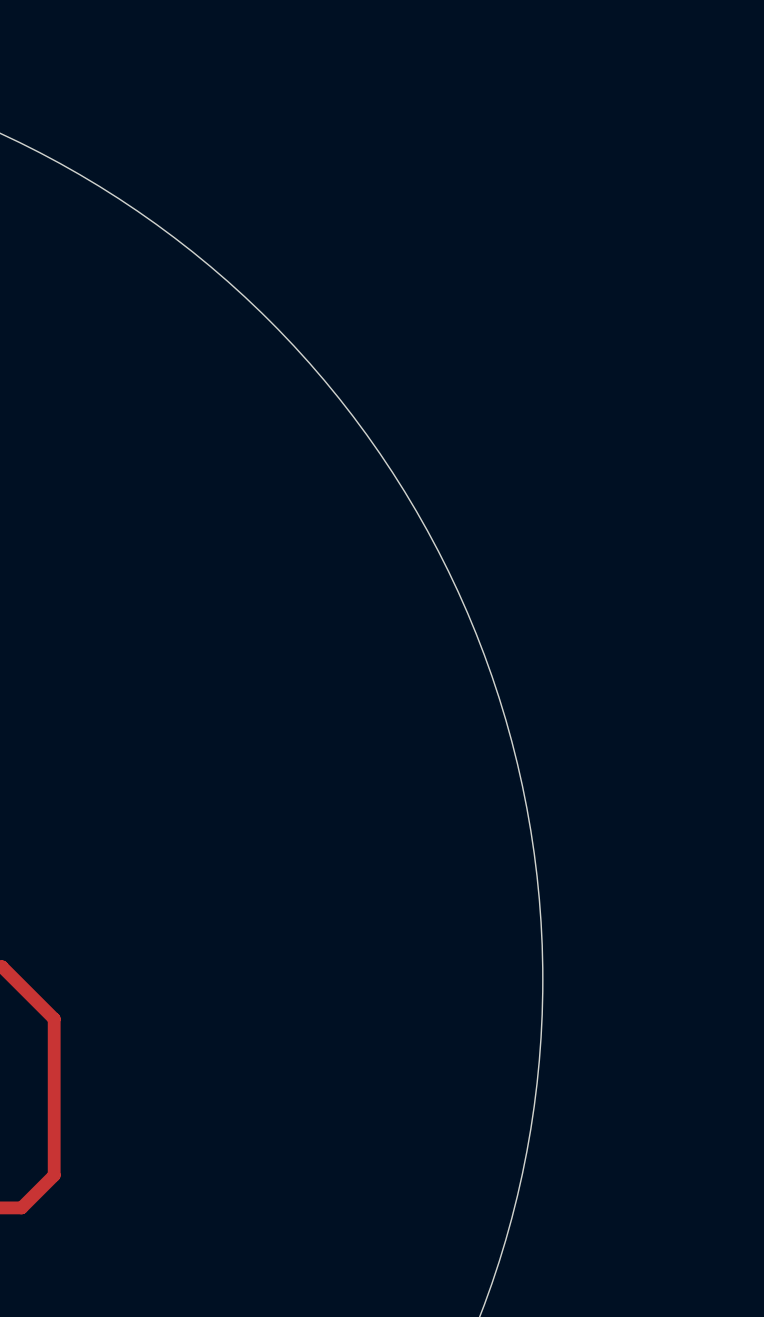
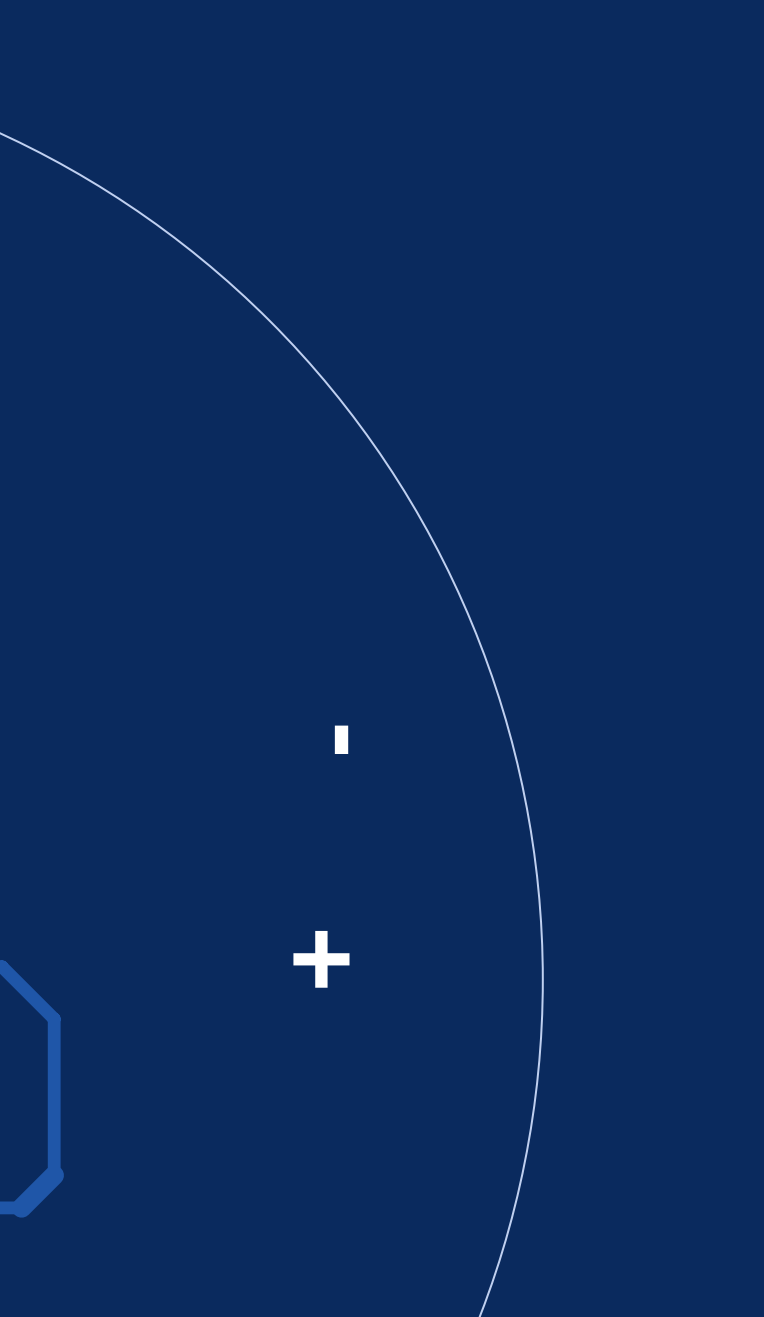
text: none -> - (341, 739)
text: none -> + (321, 959)
track width: thin (54, 1175) (21, 1207) -> thick (54, 1175) (21, 1207)

